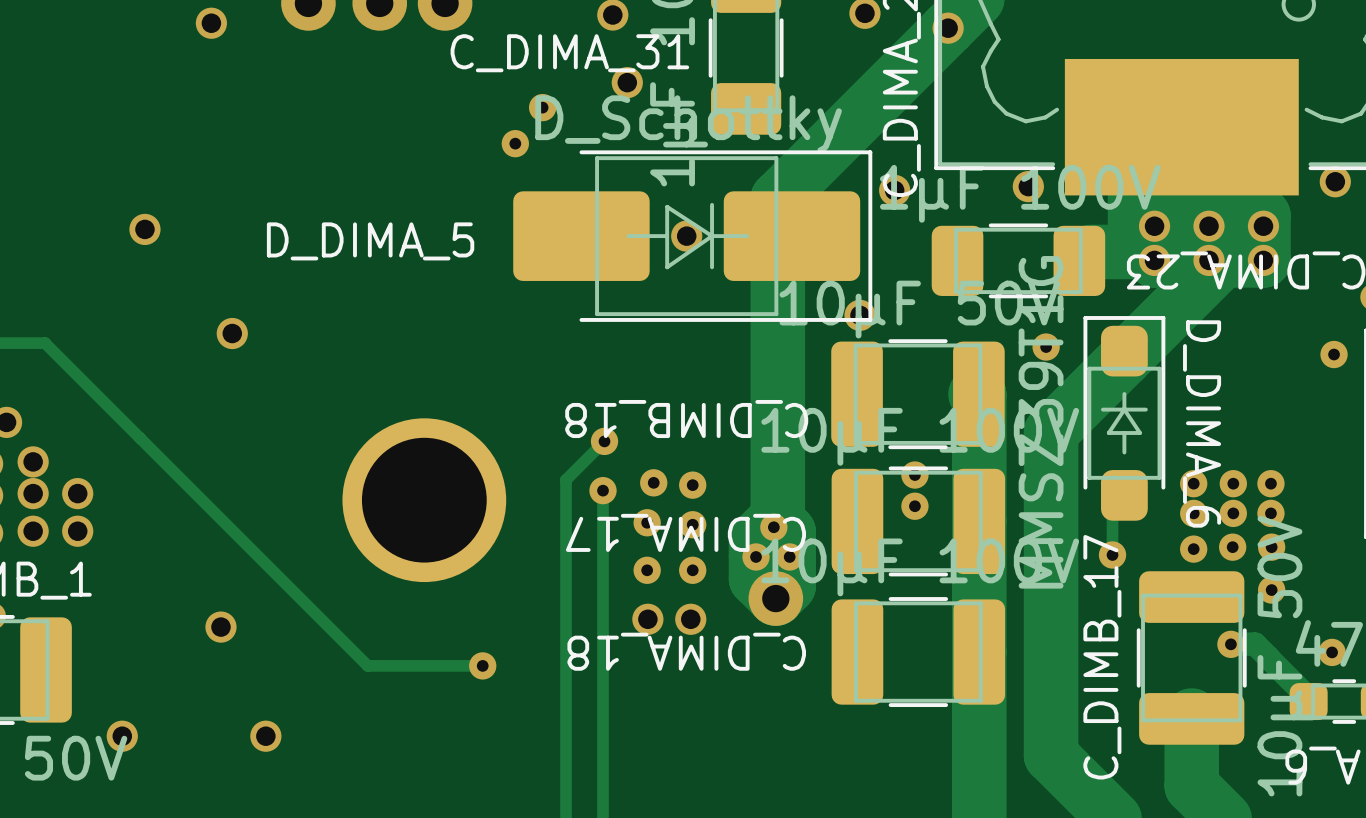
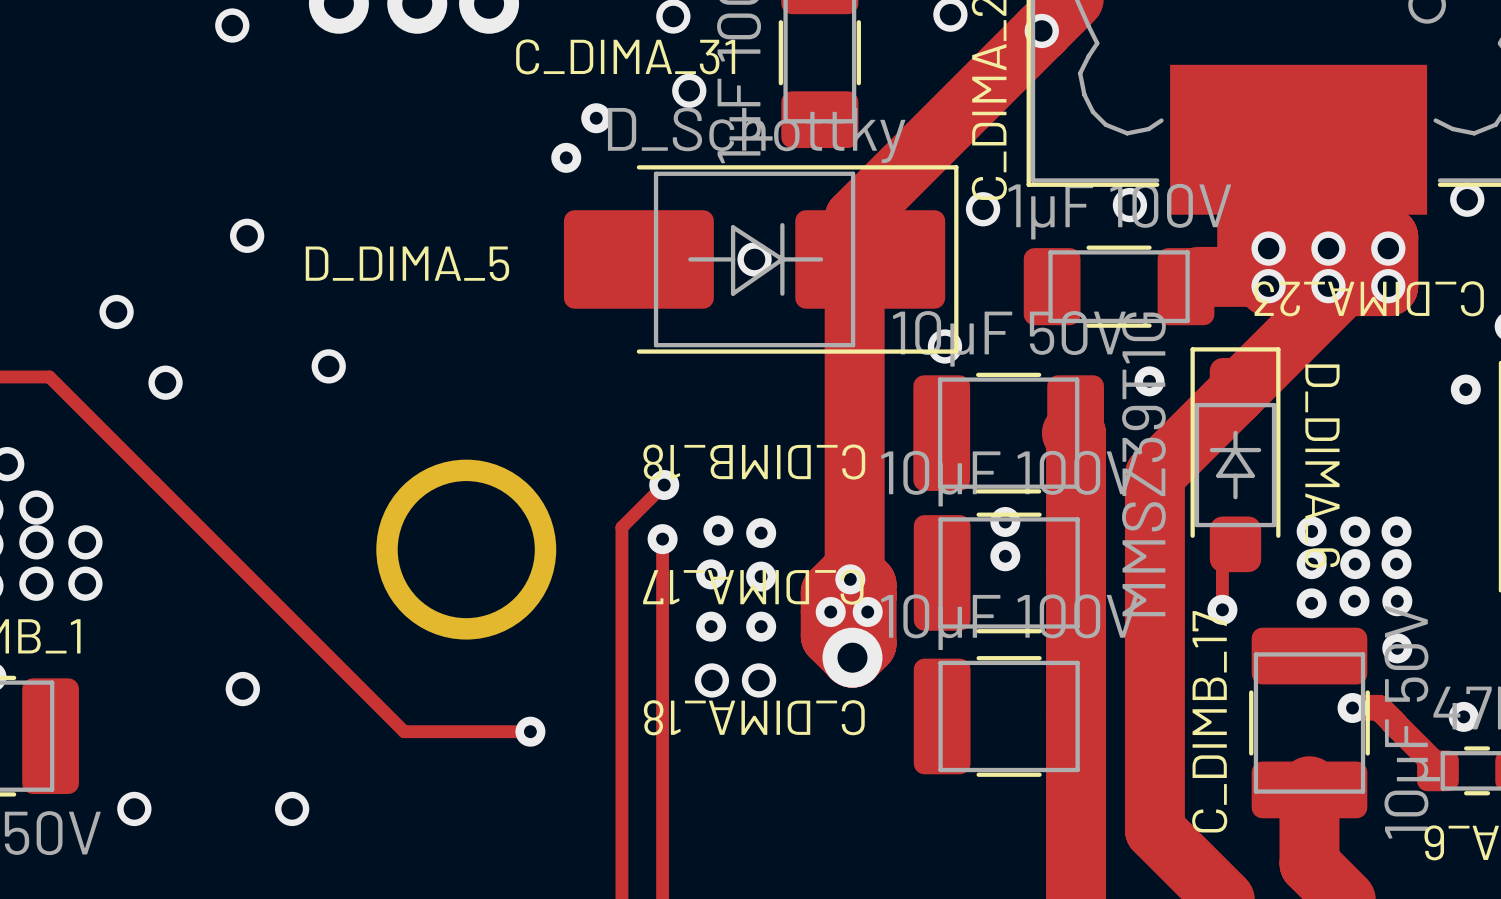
via: none -> (247, 235)
via: (144, 229) -> none
via: none -> (116, 311)
via: (232, 333) -> none
via: none -> (328, 366)
via: none -> (165, 382)

